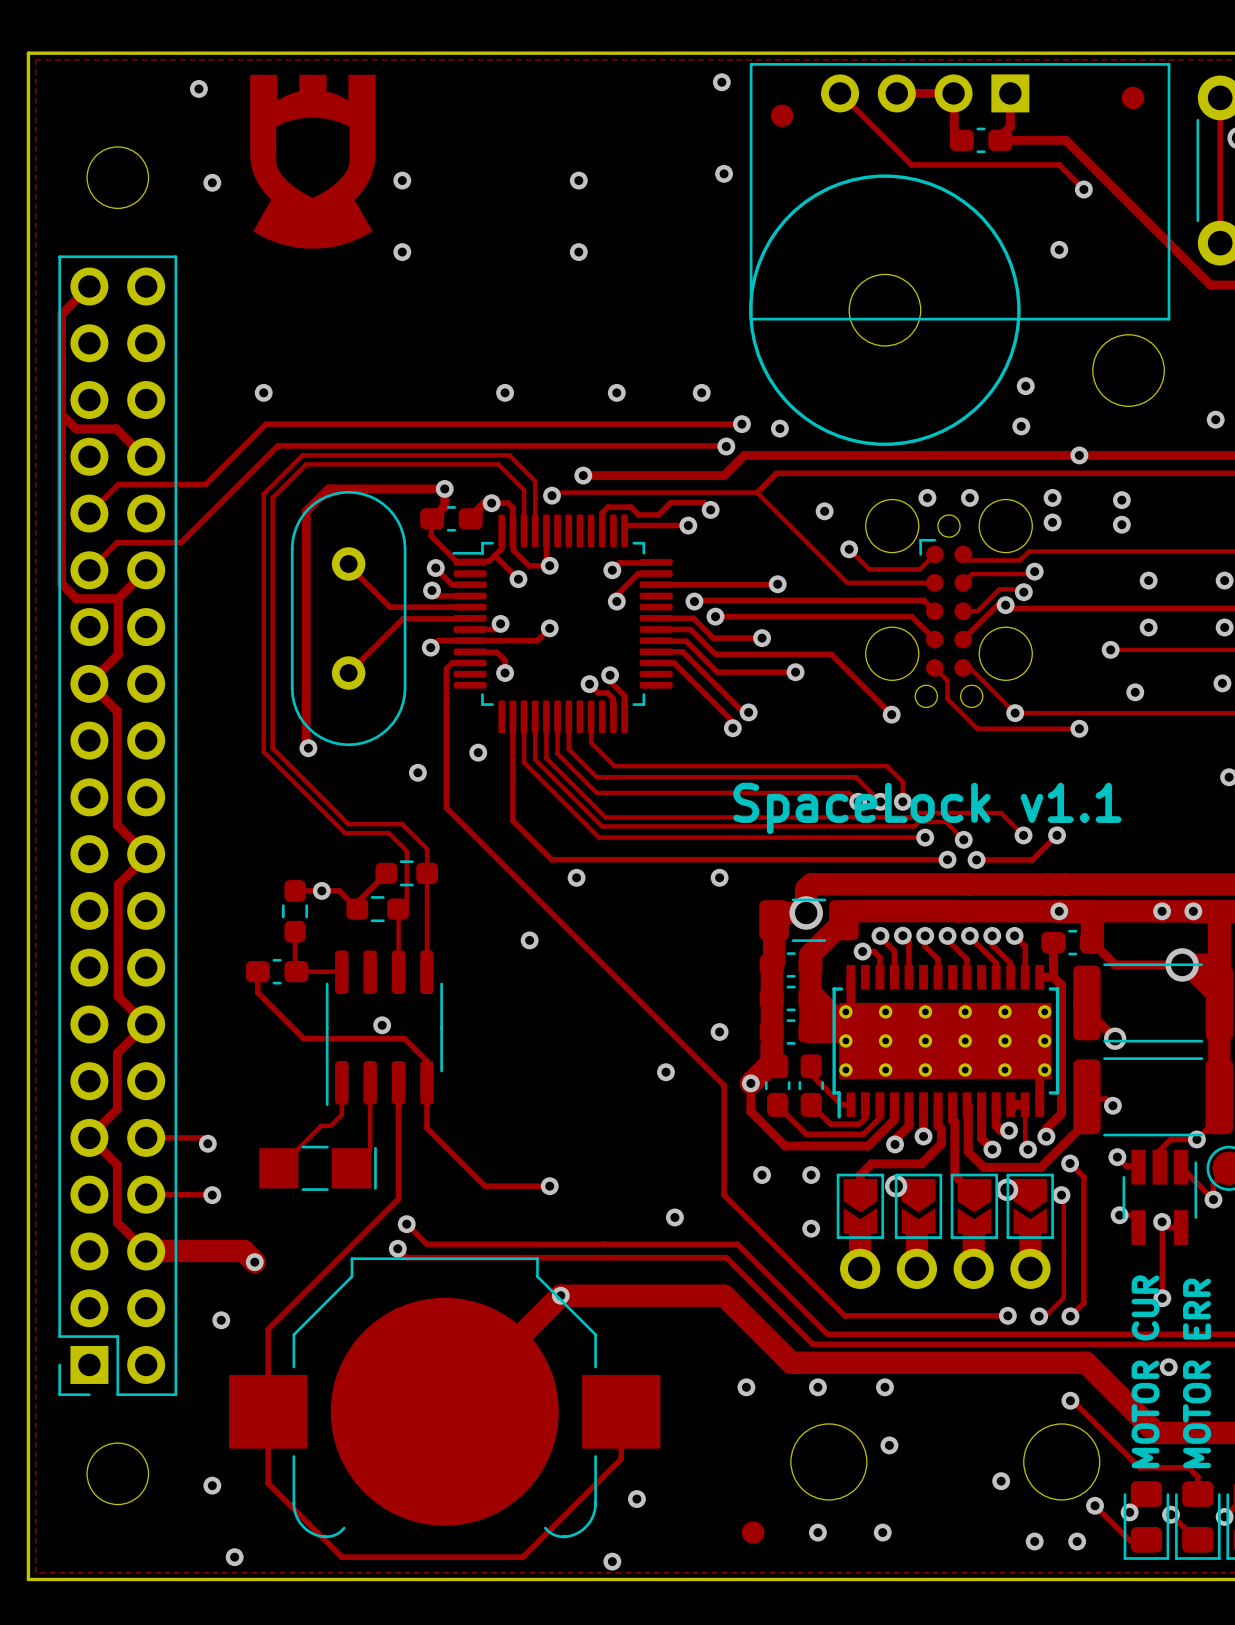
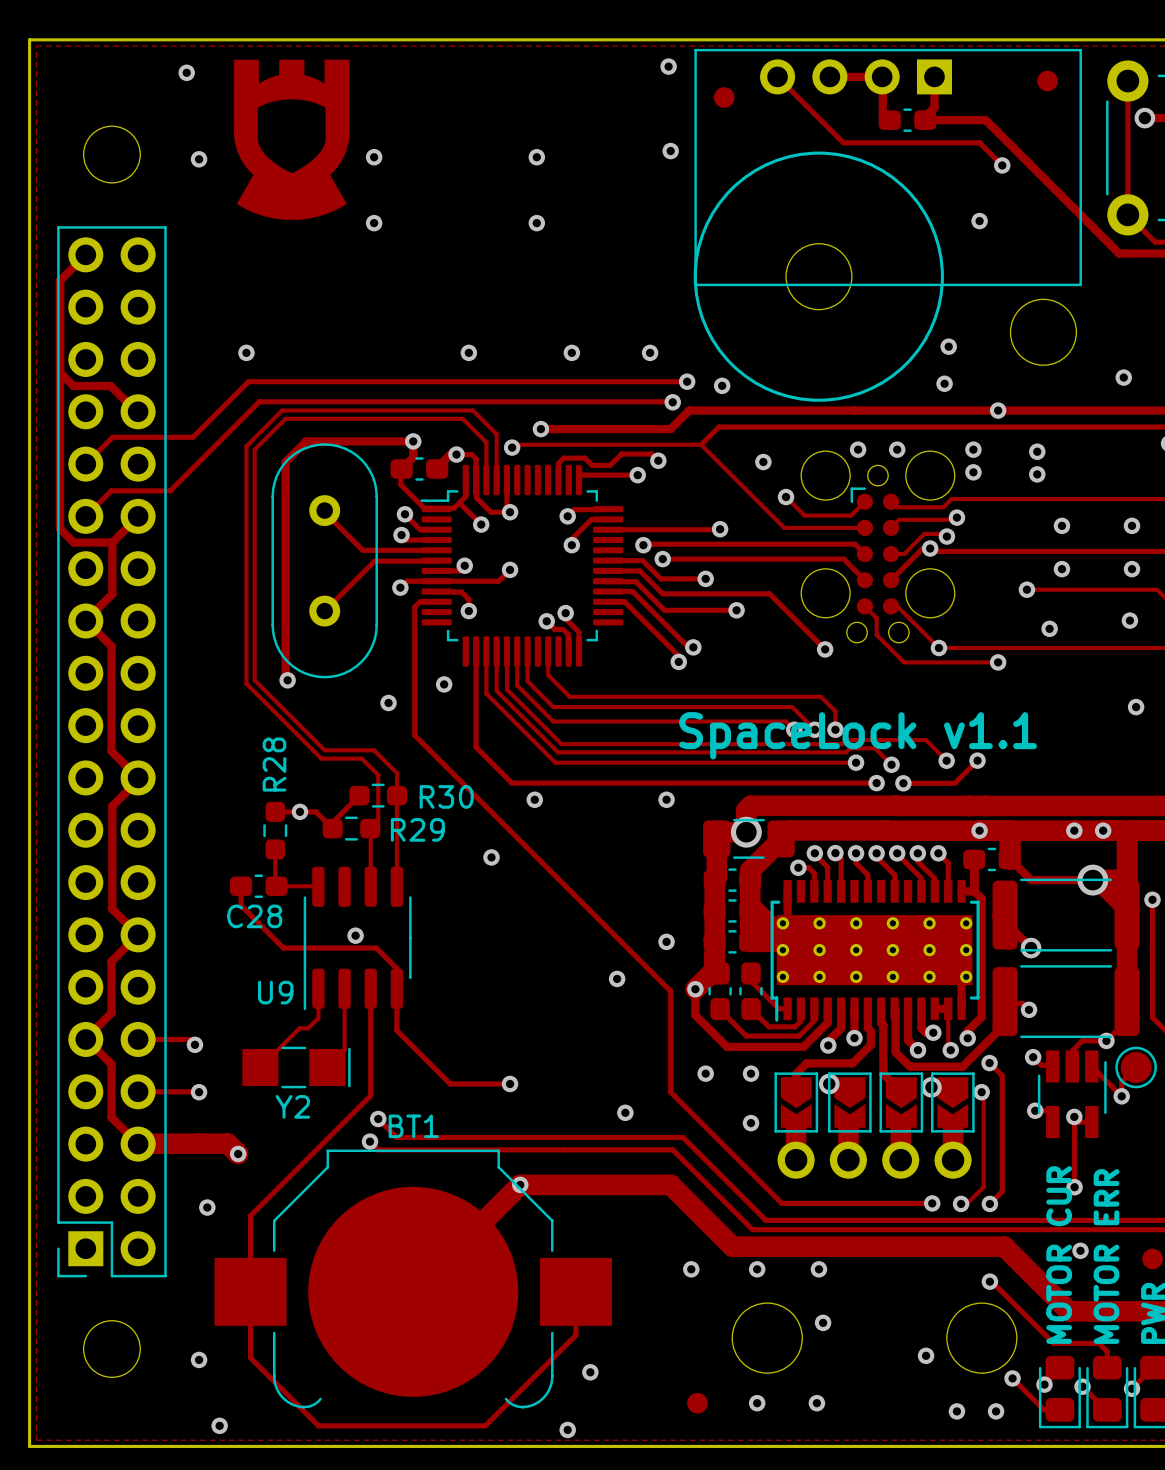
R28 name: none -> R28 (274, 764)
R30 name: none -> R30 (446, 796)
R29 name: none -> R29 (417, 829)
C28 name: none -> C28 (254, 916)
U9 name: none -> U9 (275, 992)
Y2 name: none -> Y2 (292, 1106)
BT1 name: none -> BT1 (413, 1126)

